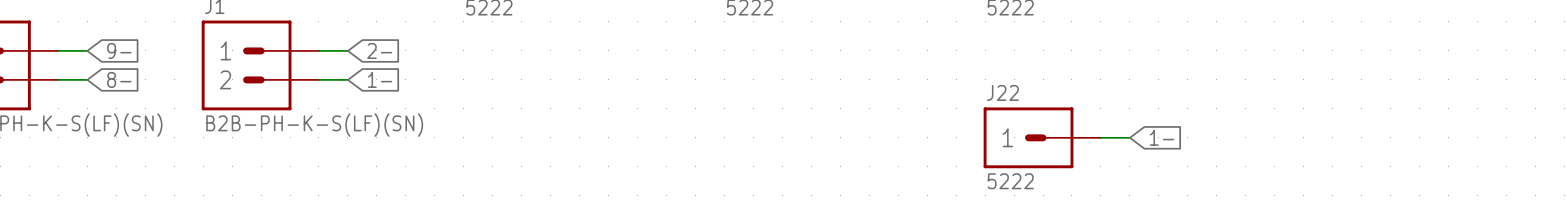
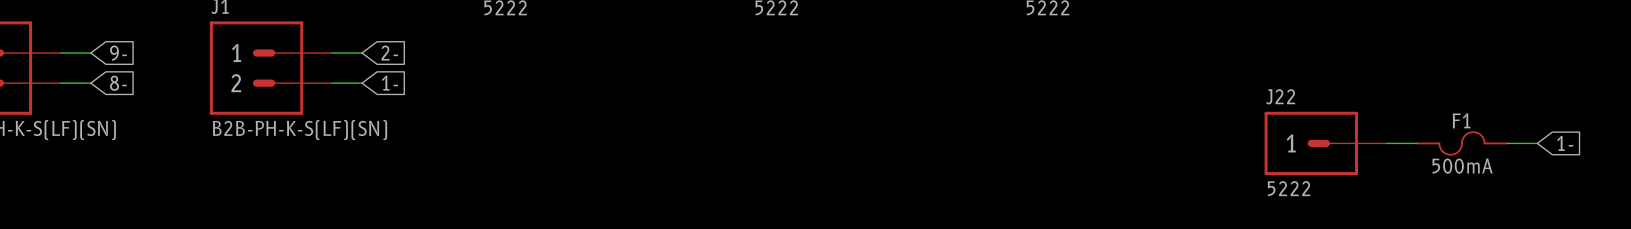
J22 position: (1042, 137) -> (1325, 143)
wire: (1100, 137) (1129, 137) -> (1386, 143) (1416, 143)
global label: 1- (1161, 137) -> none
F1: none -> (1461, 143)
wire: none -> (1507, 143) (1537, 143)
global label: none -> 1- (1565, 143)

